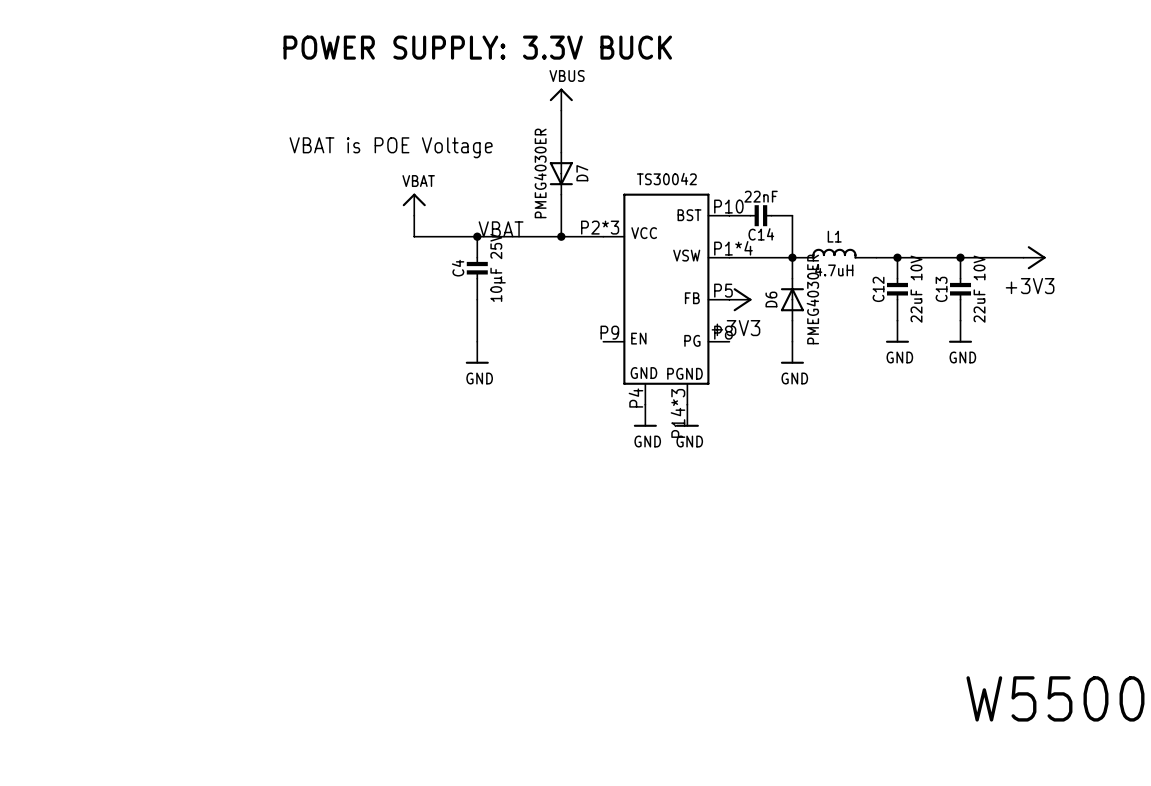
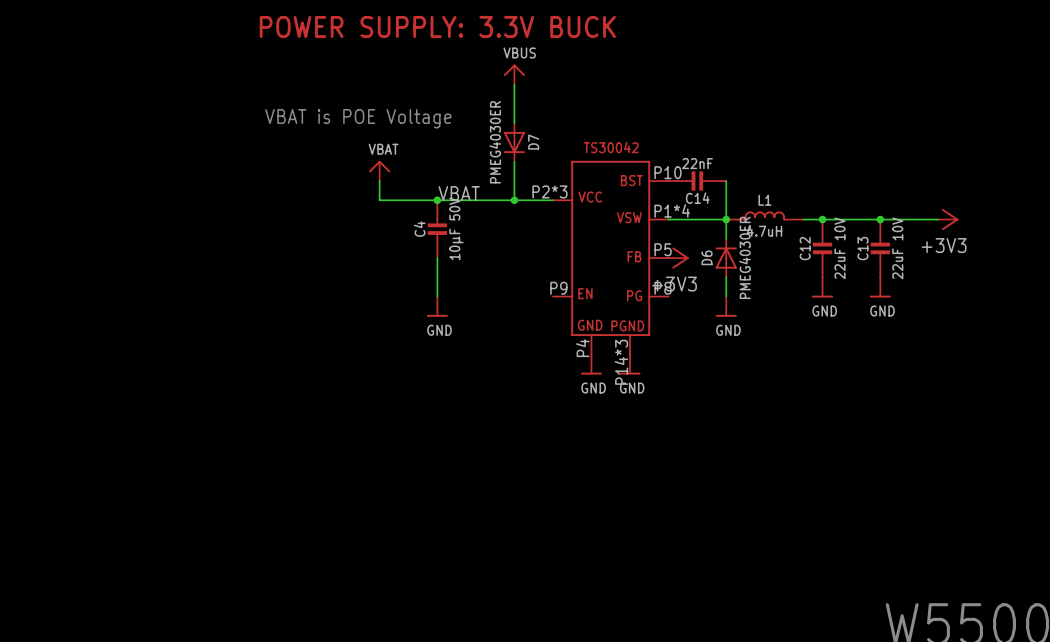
C4 value: 10µF 25V (498, 267) -> 10µF 50V (456, 228)

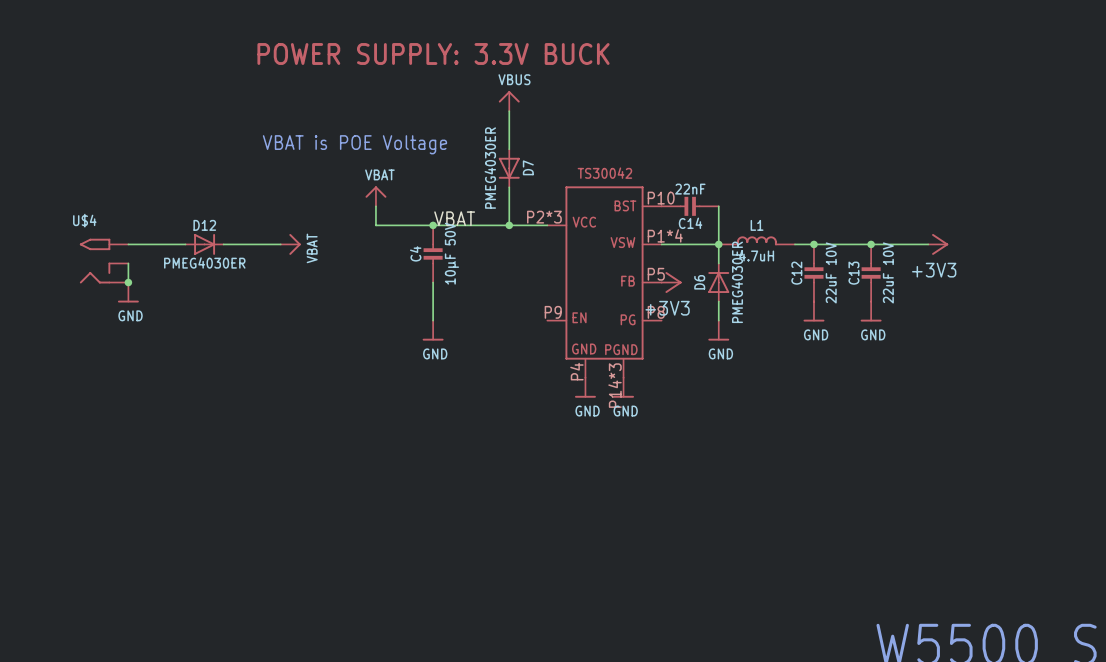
wire: none -> (128, 244) (185, 244)
D12: none -> PMEG4030ER (204, 244)
wire: none -> (223, 244) (280, 244)
power symbol: none -> VBAT (290, 244)
U$4: none -> (104, 261)
wire: none -> (128, 263) (128, 282)
junction: none -> (128, 282)
power symbol: none -> GND (128, 292)

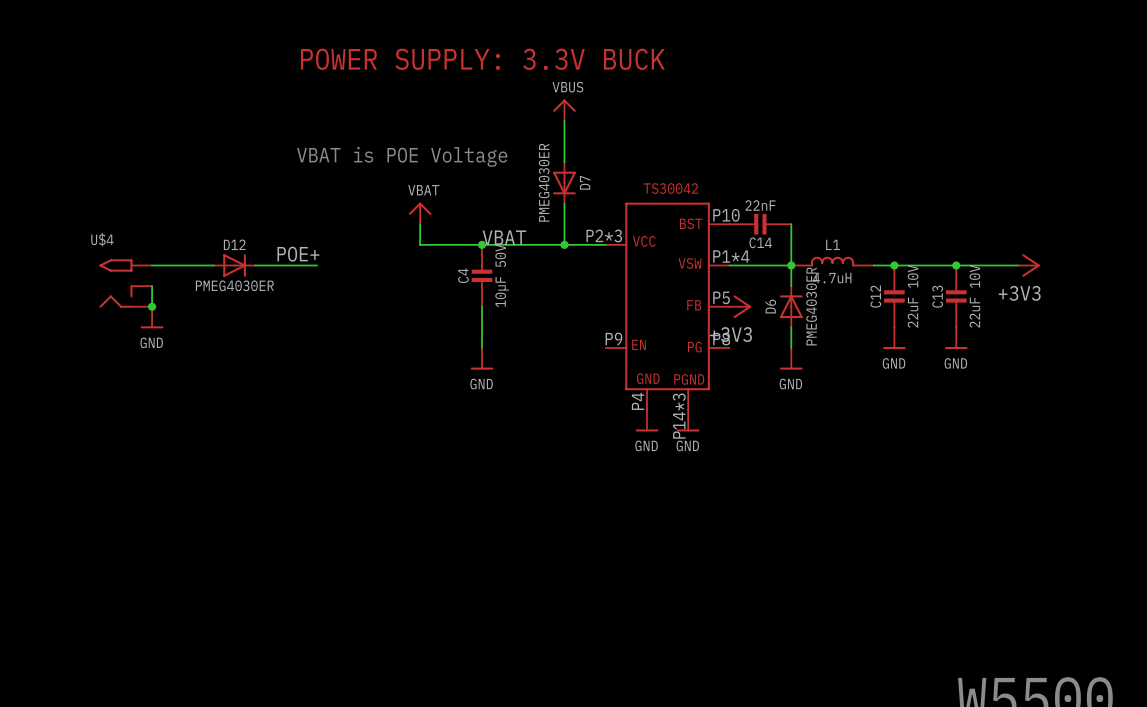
label: none -> POE+ (298, 254)
power symbol: VBAT (290, 244) -> none

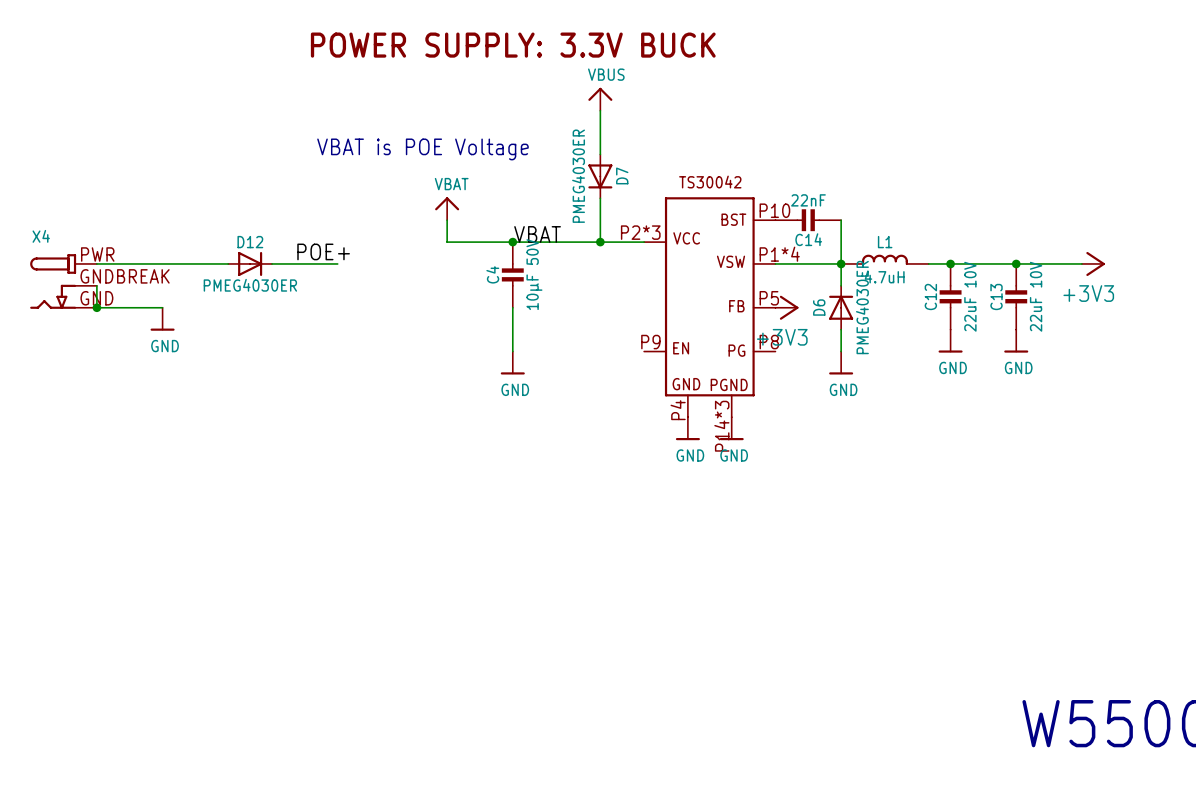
wire: none -> (96, 263) (162, 263)
X4: none -> (63, 281)
U$4: (125, 283) -> none
wire: (152, 286) (152, 306) -> (96, 285) (96, 307) (162, 307)
junction: none -> (96, 307)
junction: (152, 306) -> none

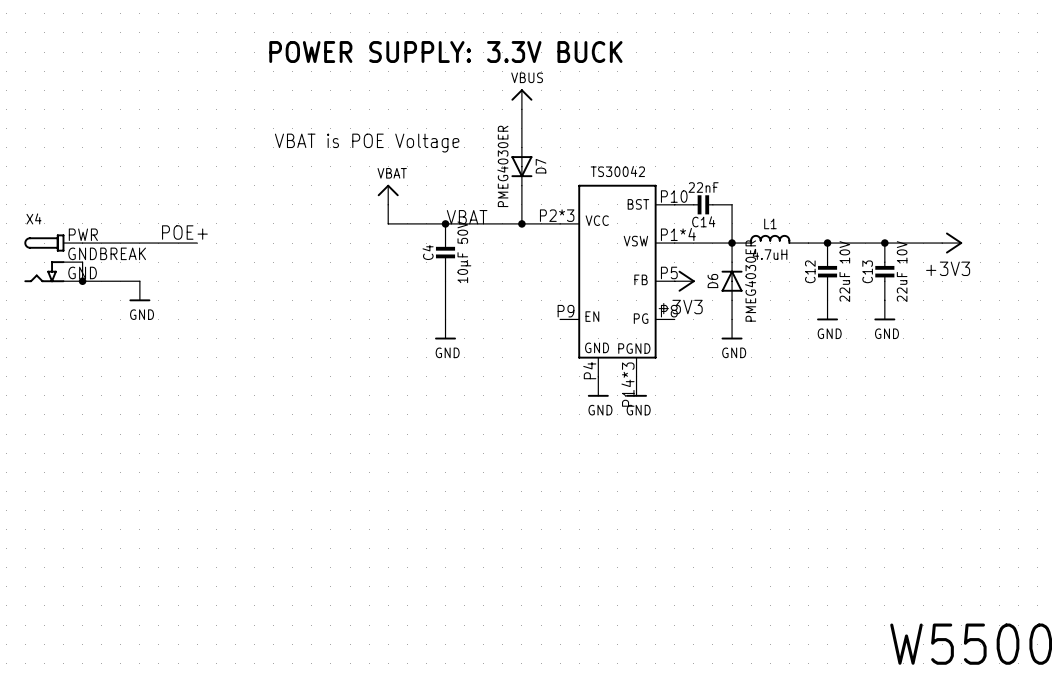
label position: POE+ (323, 251) -> POE+ (184, 232)
D12: PMEG4030ER (250, 263) -> none
wire: (272, 263) (337, 263) -> none

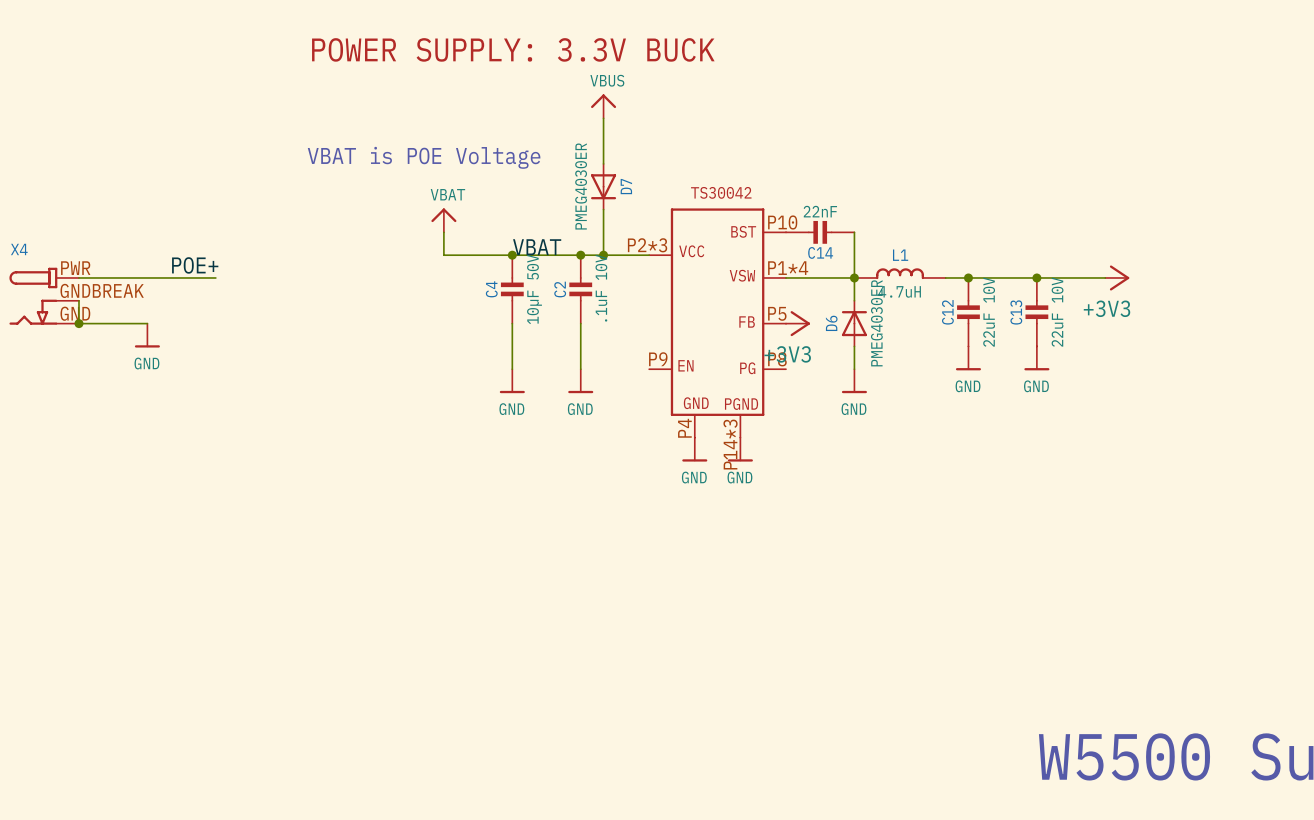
junction: none -> (580, 255)
C2: none -> .1uF 10V (580, 289)
wire: none -> (580, 323) (580, 369)
power symbol: none -> GND (580, 381)

